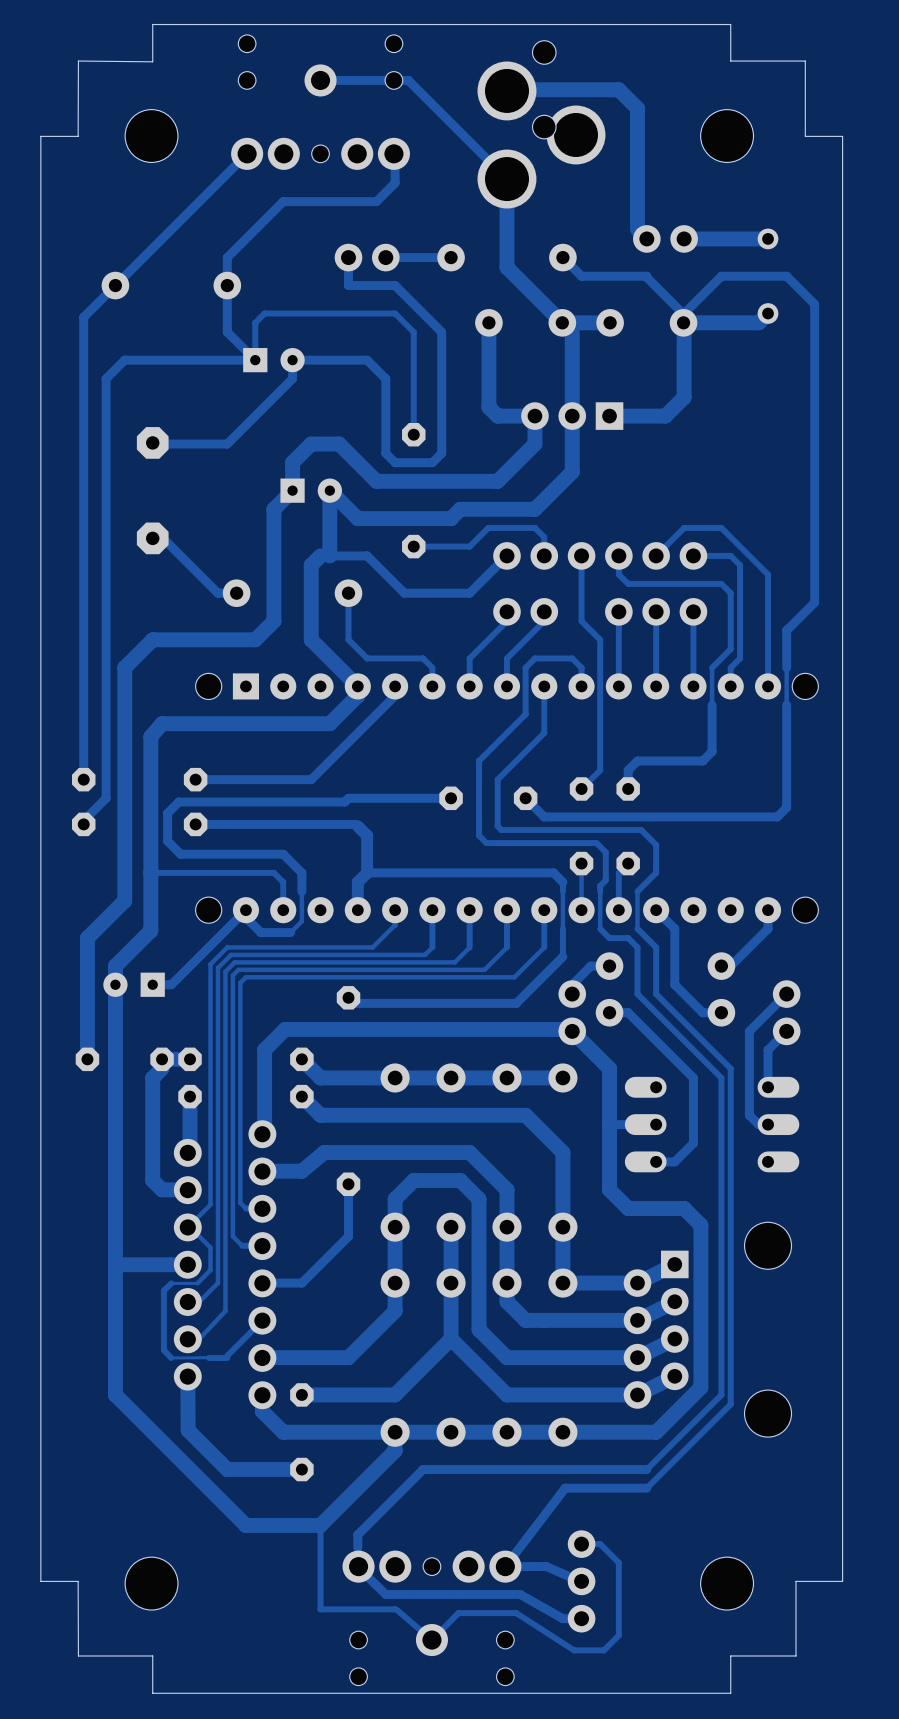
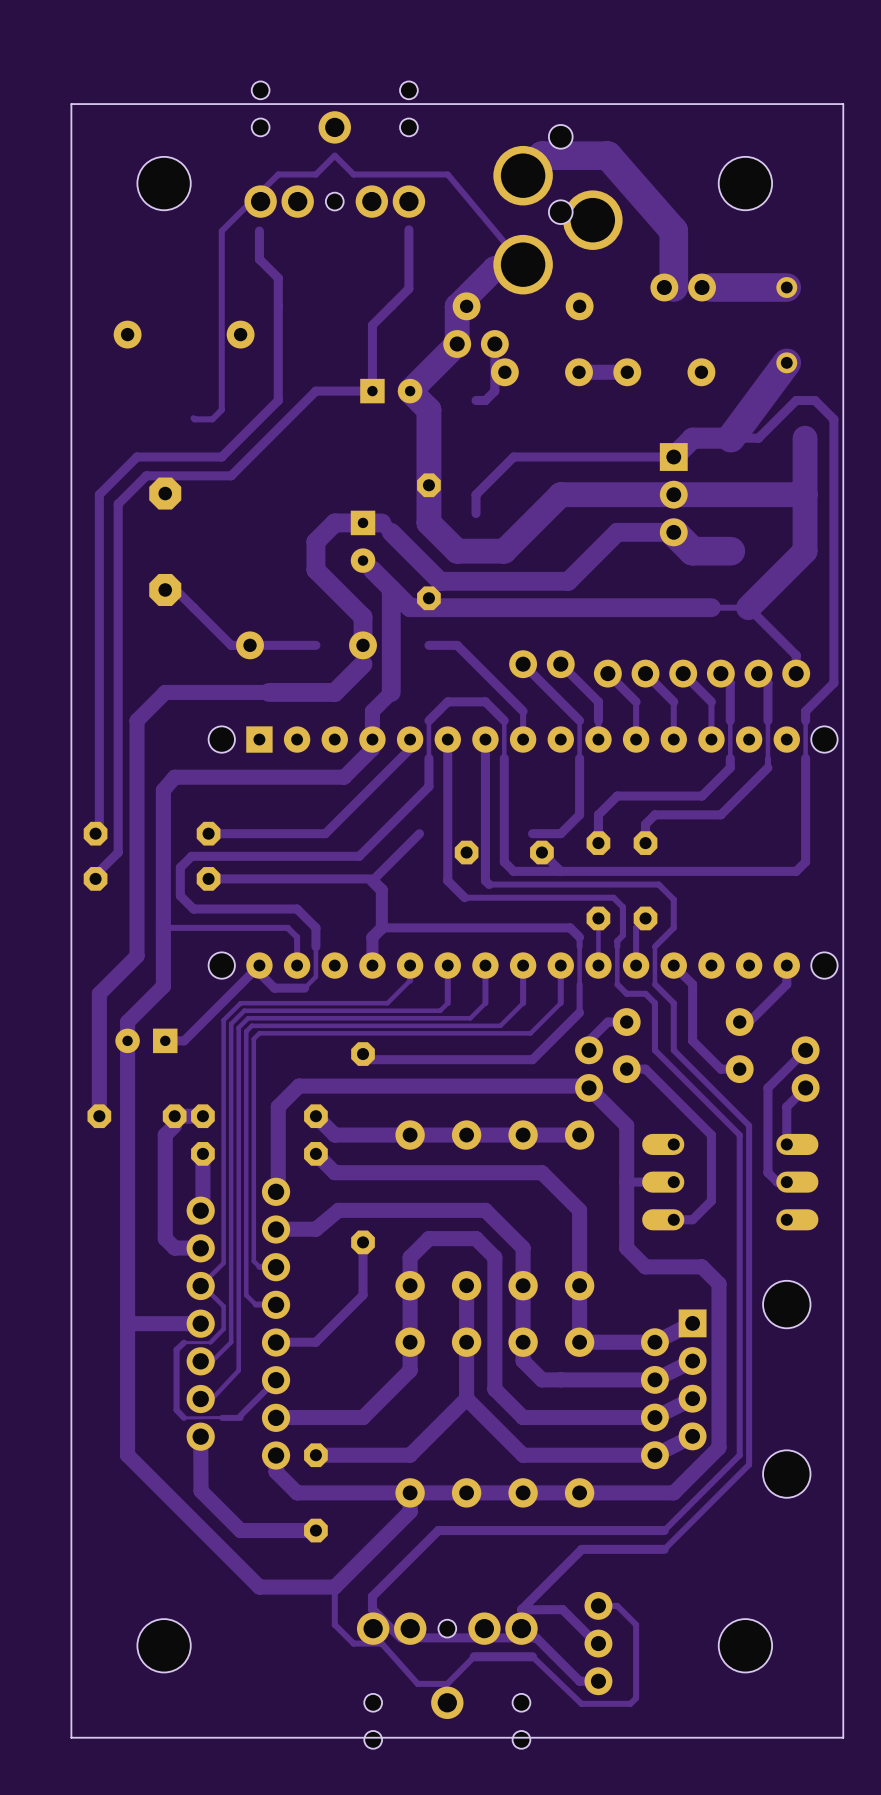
board edge: (730, 24) (730, 61) (805, 61) (805, 136) (842, 136) (842, 1581) (795, 1581) (795, 1655) (730, 1655) (730, 1693) (152, 1693) (152, 1655) (78, 1655) (78, 1581) (40, 1581) (40, 136) (78, 136) (78, 61) (152, 61) (152, 24) (730, 24) -> (843, 104) (843, 1737) (71, 1737) (71, 104) (843, 104)
track: (320, 80) (408, 80) (506, 179) (506, 267) (572, 332) (572, 472) (534, 509) (460, 509) (451, 518) (357, 518) -> (711, 607) (410, 607) (372, 570)
track: (506, 90) (618, 89) (637, 108) (637, 229) (646, 238) -> none
part position: (541, 124) -> (557, 209)
track: none -> (523, 175) (541, 155) (607, 155) (673, 231) (673, 287)
track: (247, 153) (83, 317) (83, 779) -> none
track: (393, 153) (395, 183) (376, 201) (283, 201) (227, 257) (227, 332) (255, 360) -> none
track: none -> (259, 231) (259, 259) (278, 278) (278, 400) (221, 457) (137, 457) (99, 494) (99, 829)
track width: thin (768, 238) (693, 238) -> thick (786, 287) (711, 287)
track: (348, 257) (348, 285) (395, 285) (441, 332) (441, 453) (432, 462) (395, 462) (385, 453) (385, 378) (367, 360) (292, 360) (292, 378) (227, 444) (152, 442) -> none
part position: (367, 257) -> (476, 344)
track: (451, 257) (385, 257) -> none
track: (562, 257) (581, 276) (646, 276) (683, 314) -> none
track: none -> (494, 344) (494, 391) (485, 400) (476, 400)
track: (768, 313) (758, 322) (683, 322) -> (786, 362) (730, 438)
track: (683, 314) (721, 276) (786, 276) (814, 304) (814, 369) -> (730, 438) (758, 438) (796, 400) (815, 400) (833, 419)
track: (488, 322) (488, 407) (497, 416) (534, 416) (534, 444) (497, 481) (376, 481) -> (730, 551) (692, 551) (673, 532) (617, 532) (568, 581) (440, 581) (391, 532)
track: (683, 322) (684, 397) (665, 416) (609, 416) -> none
part: none -> (391, 391)
track: (255, 360) (124, 360) (106, 378) (106, 453) -> (408, 229) (408, 288) (372, 325) (372, 391) (315, 391) (231, 475) (146, 475) (118, 504)
part: (273, 360) -> none
track: (413, 360) (413, 332) (395, 313) (264, 313) (255, 322) (255, 360) -> (428, 409) (410, 391) (457, 344) (457, 306) (494, 268) (519, 268) (523, 264) (447, 174) (353, 174) (334, 155) (315, 174) (278, 174) (221, 231) (221, 409) (212, 419) (193, 418)
track width: thin (413, 360) (413, 434) -> thick (428, 409) (428, 485)
track: none -> (730, 438) (692, 438) (673, 457) (513, 457) (476, 494) (476, 513)
track: none -> (805, 438) (805, 551) (748, 607) (796, 655) (796, 673)
part rotation: 0° (572, 416) -> 90° counterclockwise (673, 494)
part position: (572, 416) -> (673, 494)
track: none -> (428, 485) (428, 522) (457, 551) (504, 551) (560, 494) (805, 494)
track: (367, 472) (339, 444) (311, 444) (292, 462) (292, 490) (273, 509) (273, 621) (255, 639) -> (381, 522) (334, 522) (315, 541) (315, 570) (363, 617) (363, 645)
part rotation: 0° (311, 490) -> 90° clockwise (363, 541)
part position: (311, 490) -> (363, 541)
track: (348, 509) (329, 490) (329, 555) -> none
track: (413, 546) (469, 546) (488, 527) (534, 527) (544, 537) (544, 555) -> none
track: (506, 555) (469, 593) (441, 593) -> (523, 711) (457, 645)
part: (544, 555) -> none
track: (581, 555) (581, 621) (600, 639) (600, 770) (581, 788) -> (730, 767) (702, 796) (617, 796) (598, 814) (598, 843)
track: (618, 555) (618, 574) (628, 583) (721, 583) (730, 593) (730, 649) (712, 667) -> (720, 673) (730, 683) (730, 720)
track: (656, 555) (684, 527) (721, 527) (768, 574) (768, 686) -> none
part: (656, 555) -> none
track: (730, 555) (740, 565) (740, 658) (730, 667) (730, 686) -> none
track: none -> (315, 645) (250, 645)
track: (413, 593) (404, 593) (367, 555) (320, 555) (311, 565) (311, 639) (357, 686) -> (391, 588) (391, 692) (372, 711) (372, 739)
track: (814, 602) (786, 630) (786, 658) -> (833, 654) (833, 683) (805, 711)
track: (348, 611) (348, 639) (367, 658) (423, 658) (432, 667) (432, 686) -> (363, 664) (334, 692) (268, 692)
track: (506, 611) (506, 621) (469, 658) (469, 686) -> none
track: (544, 611) (544, 621) (506, 658) -> none
track: (618, 611) (618, 649) -> (607, 673) (636, 701)
track: (656, 611) (656, 649) -> (645, 673) (673, 701)
part position: (656, 611) -> (645, 673)
track: (693, 611) (693, 649) -> (683, 673) (711, 701)
track: none -> (532, 673) (579, 720) (579, 814) (560, 833) (532, 833)
track: none -> (570, 673) (598, 701) (598, 720)
part: none -> (758, 673)
track: (581, 667) (572, 658) (534, 658) (525, 667) (525, 714) (479, 761) (479, 835) (486, 843) -> (447, 739) (447, 880) (464, 897) (502, 897)
track: (544, 686) (544, 733) (497, 779) (497, 826) (501, 830) -> (485, 739) (485, 880) (489, 884) (517, 884)
track: (712, 714) (712, 751) -> (758, 673) (767, 683) (767, 767) (730, 805)
track: none -> (419, 833) (372, 880)
track: (451, 798) (348, 798) -> (560, 871) (513, 871) (504, 861) (504, 720) (485, 701) (447, 701) (428, 720) (428, 786) (363, 852)
track: (565, 1488) (505, 1566) (546, 1566) (579, 1580) -> (581, 1549) (521, 1609) (562, 1609) (596, 1643)
track: (357, 1547) (358, 1566) (385, 1594) (458, 1594) -> (334, 1624) (353, 1643) (381, 1643) (417, 1683) (447, 1683) (474, 1656)
track: none -> (372, 1609) (400, 1637) (536, 1637) (579, 1681)
track: (320, 1562) (320, 1609) (395, 1609) (431, 1640) (458, 1613) (516, 1613) (574, 1650) (603, 1650) (613, 1641) -> none
track: (516, 1594) (520, 1594) (562, 1618) -> (532, 1656) (581, 1703) (630, 1703)

